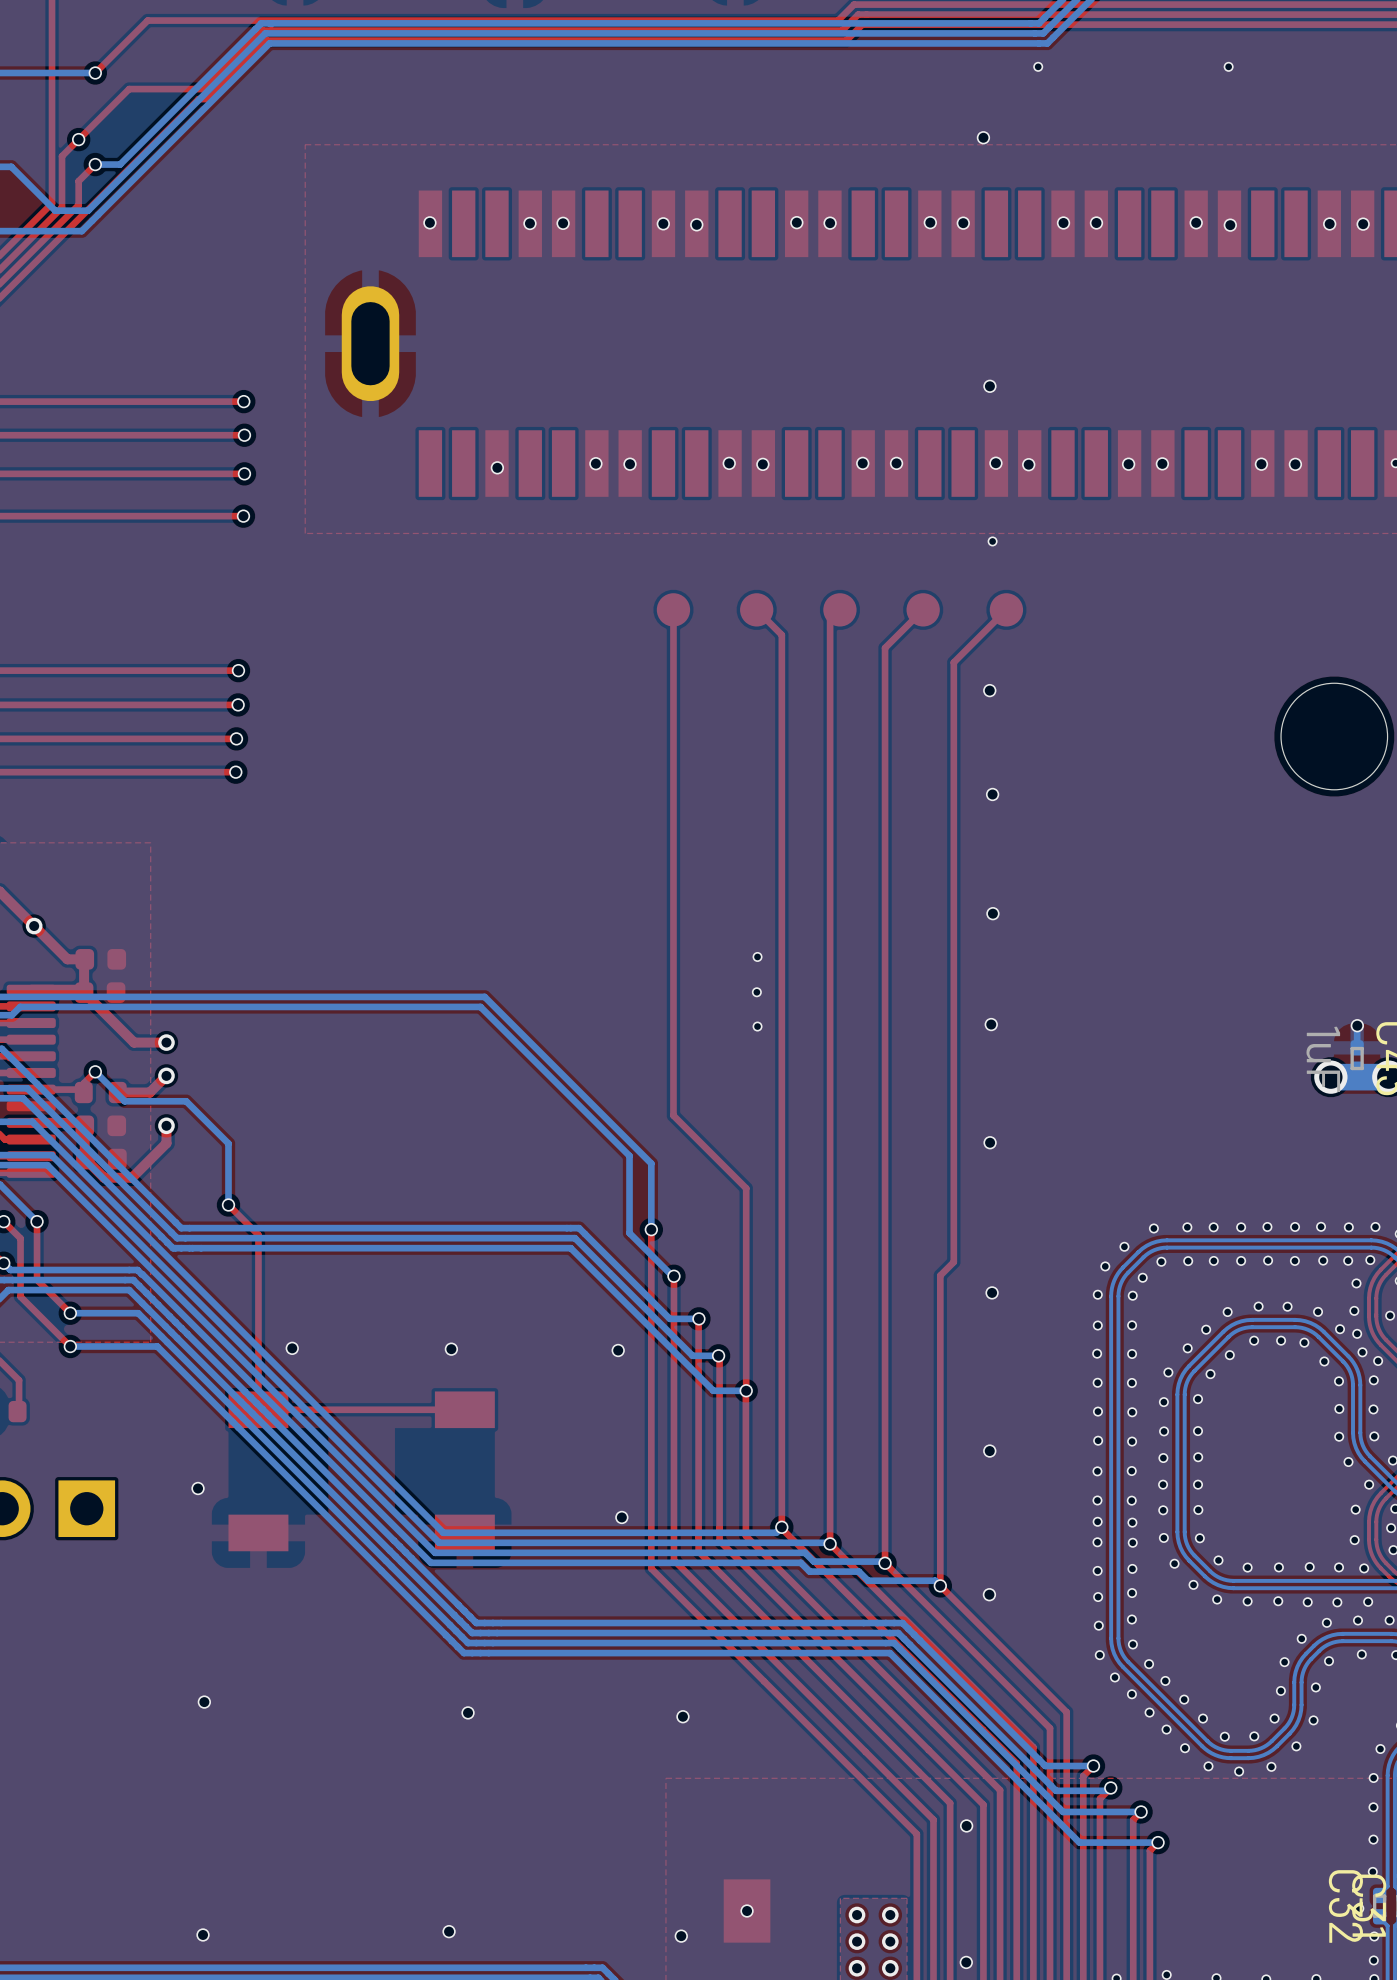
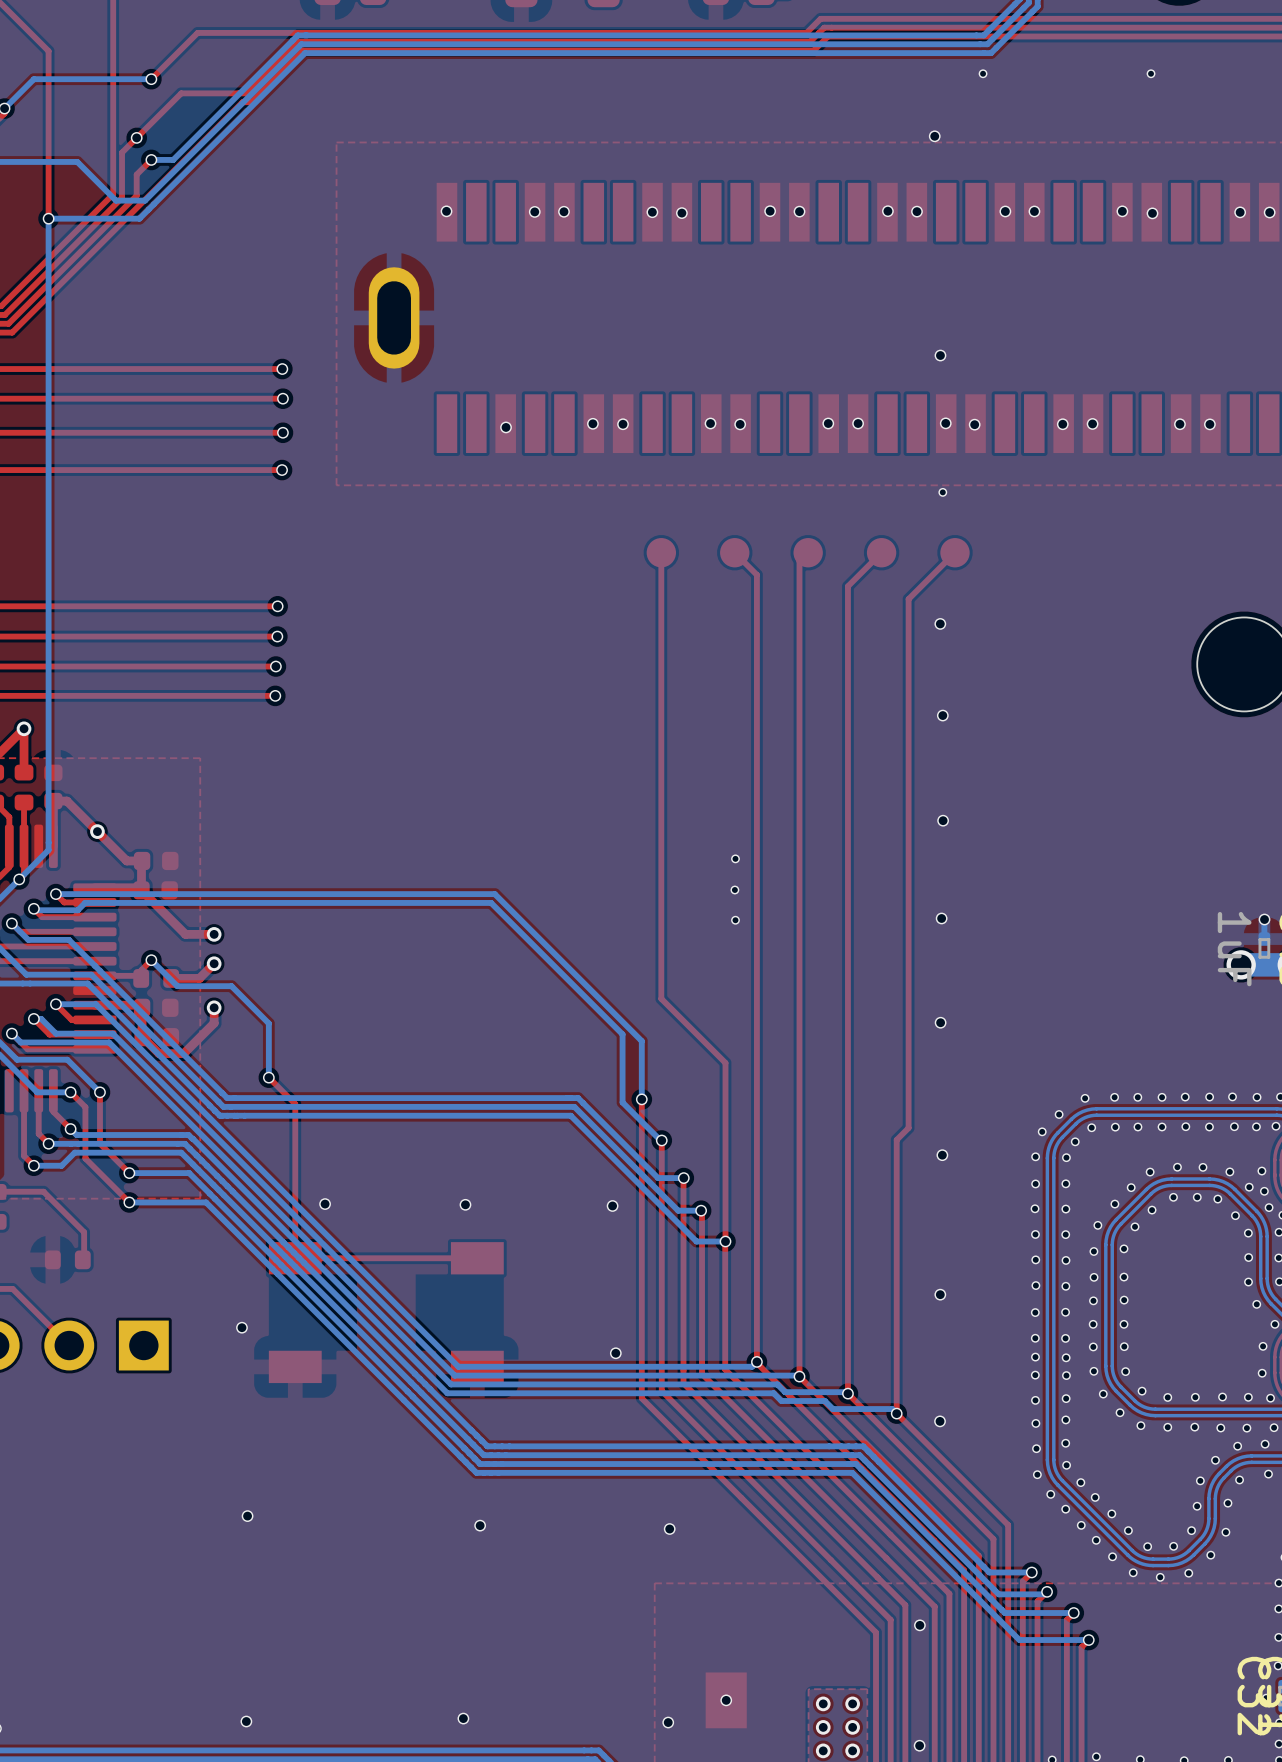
via: (1356, 1283) -> none

